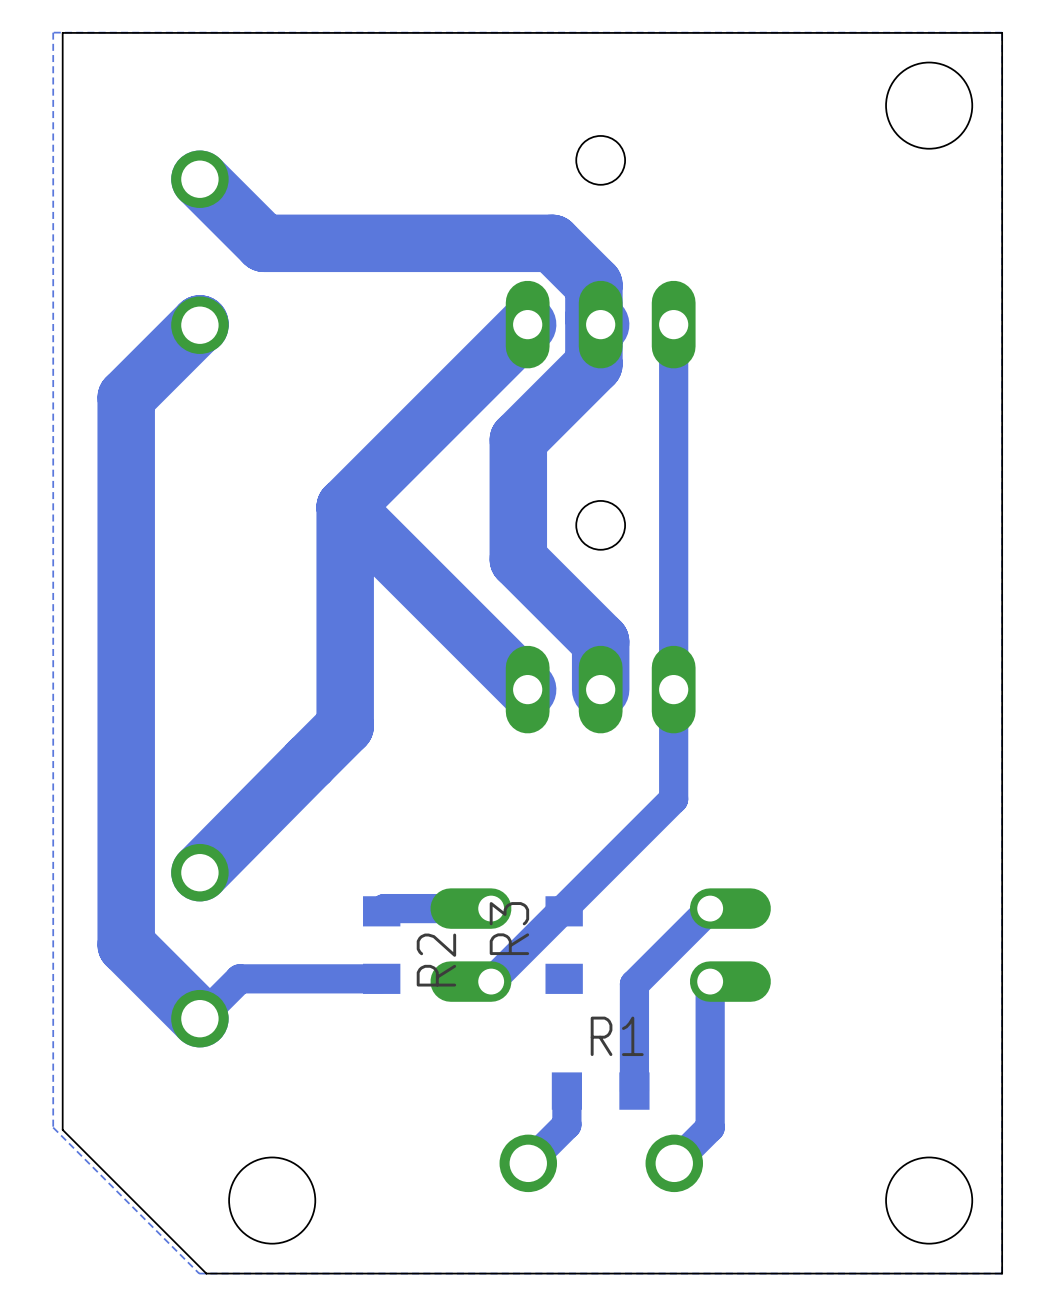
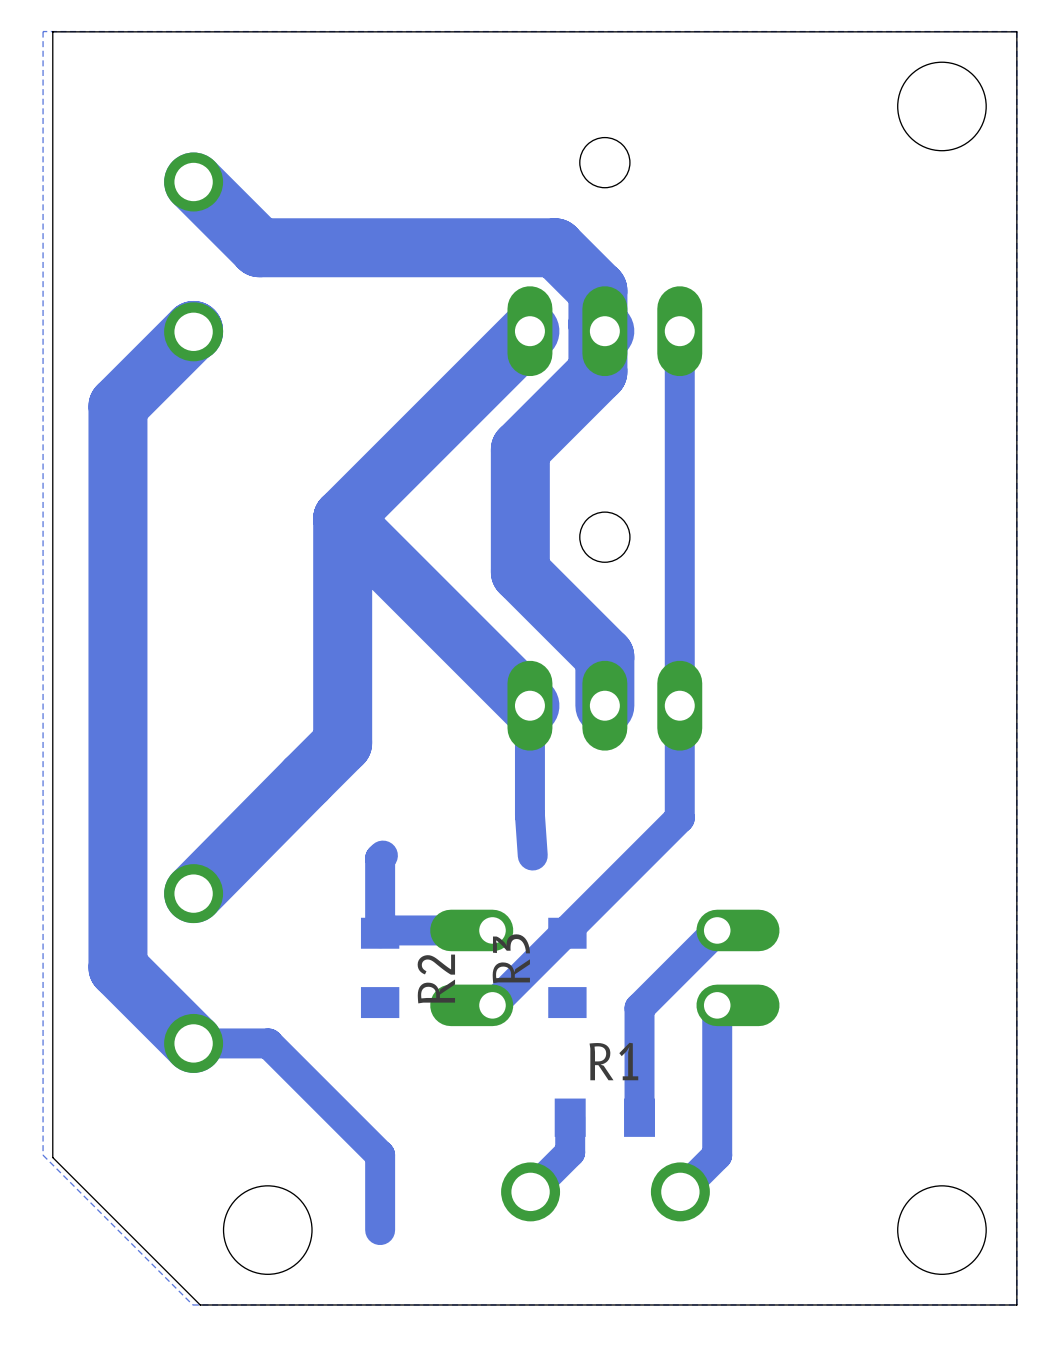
track: none -> (529, 705) (529, 815) (532, 855)
track: none -> (382, 855) (380, 858) (380, 930)
track: (381, 978) (239, 978) (200, 1018) -> (380, 1230) (380, 1155) (268, 1043) (193, 1043)

